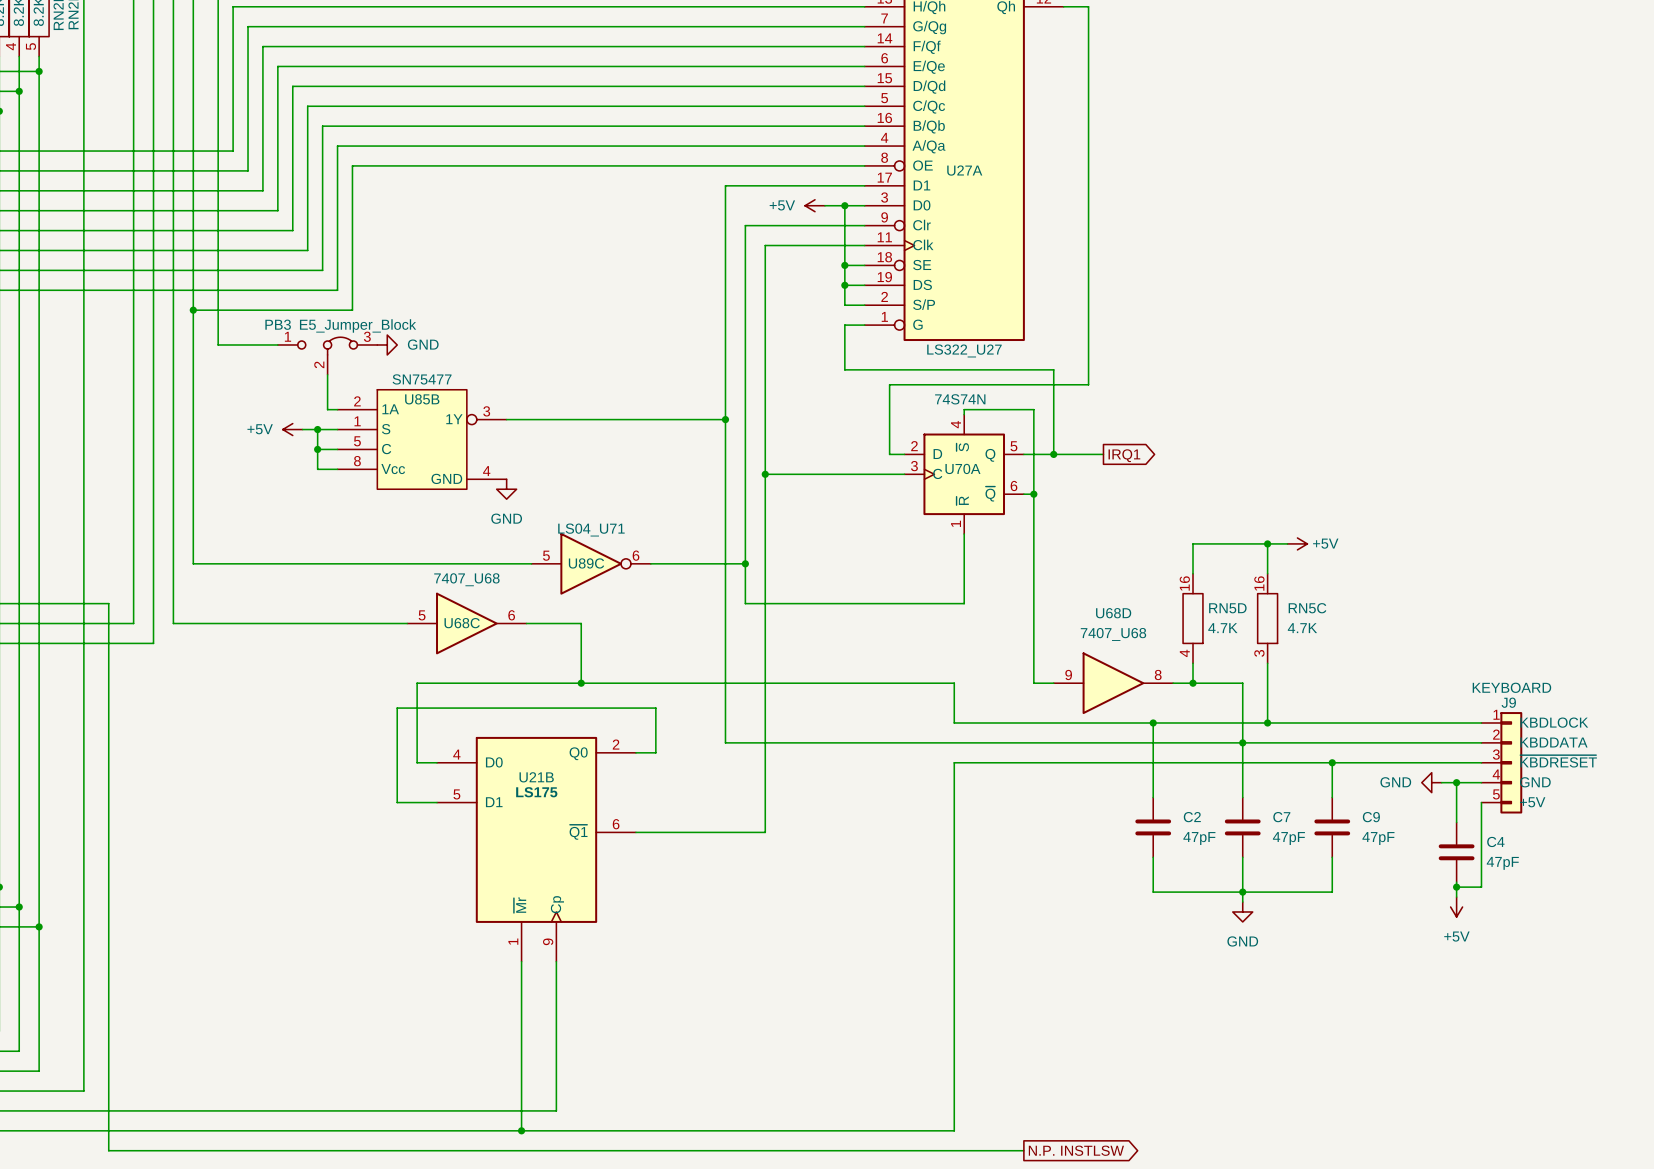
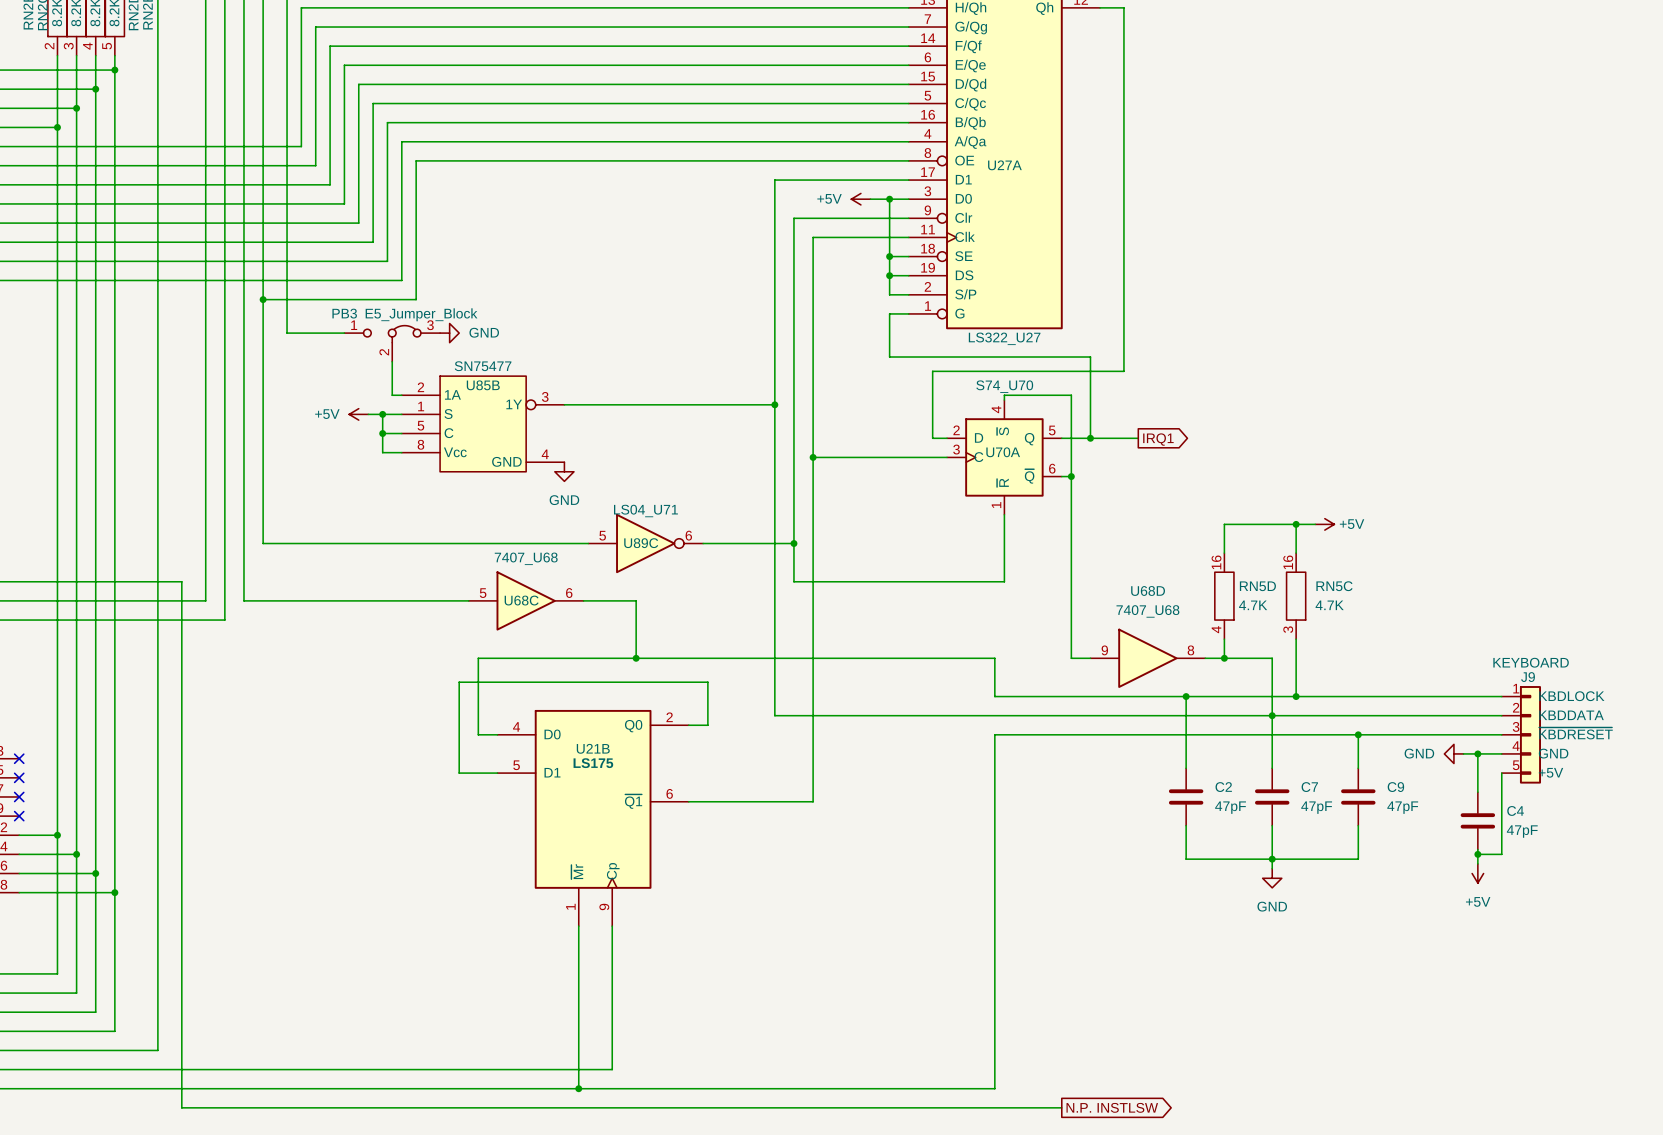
U70A value: 74S74N (960, 399) -> S74_U70 (1004, 386)

